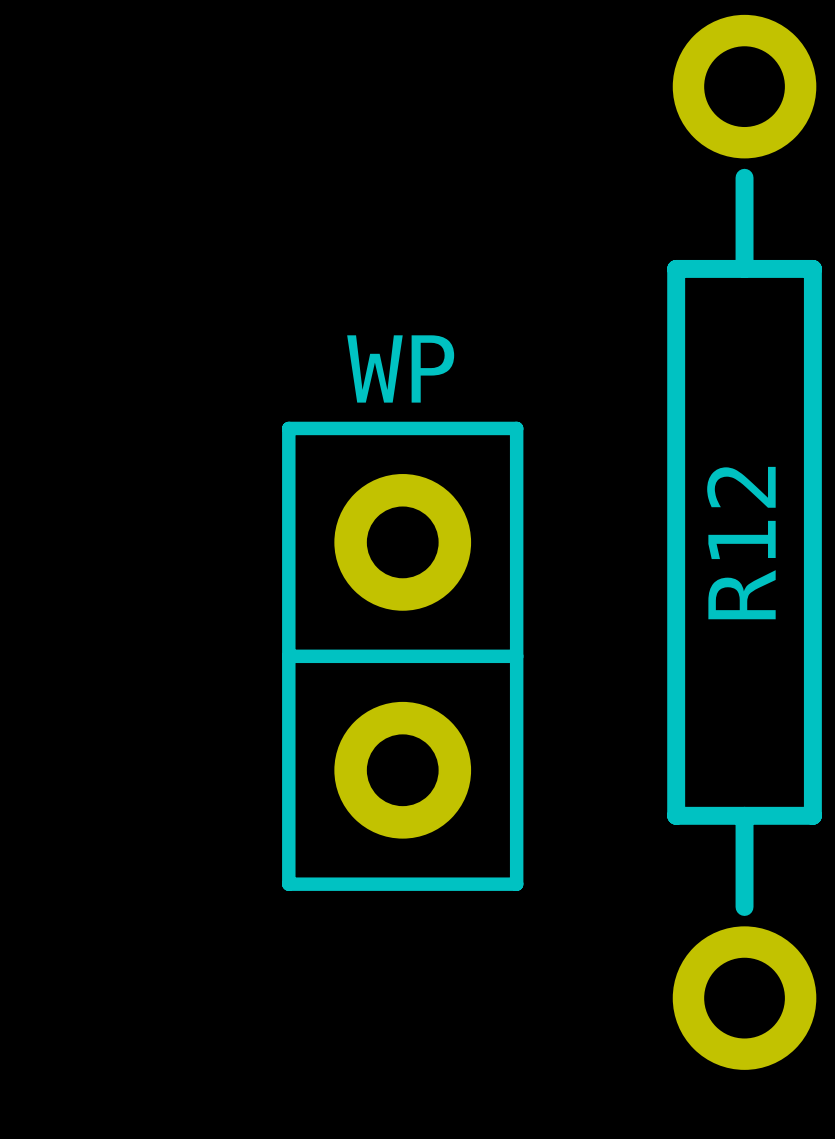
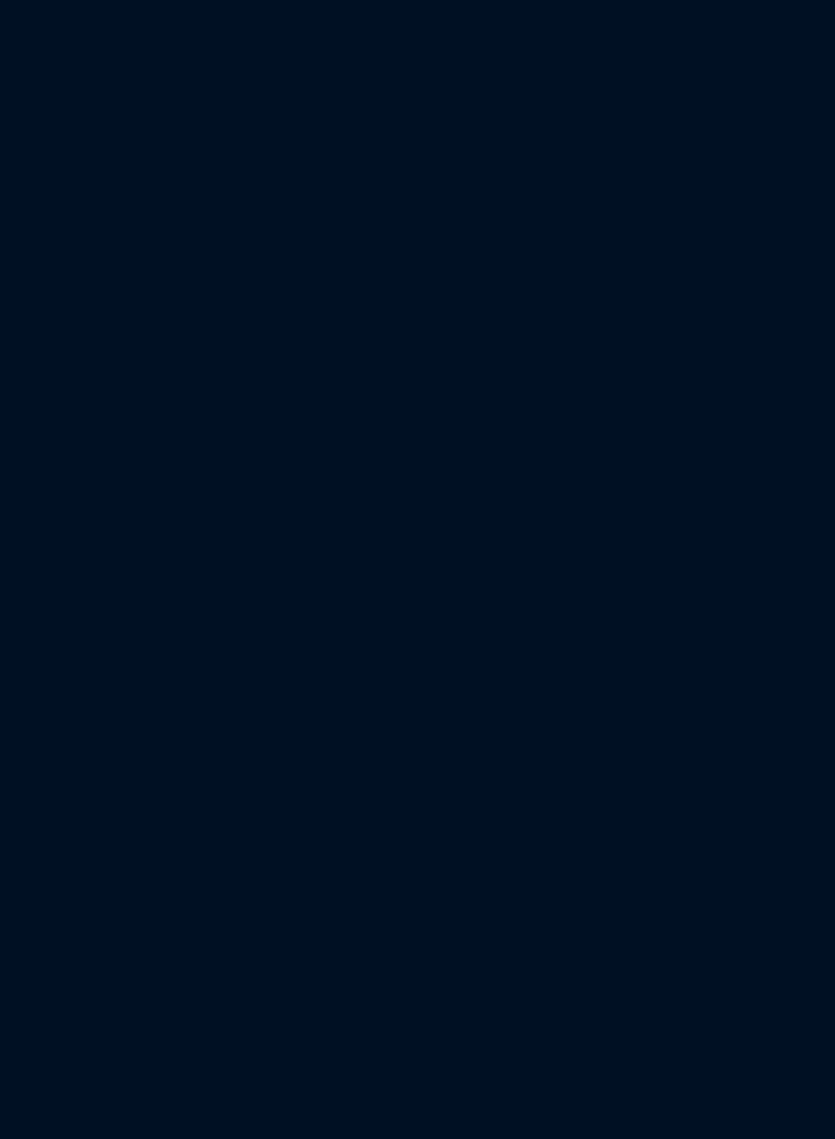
R12: (744, 542) -> none
part: WP (402, 656) -> none

